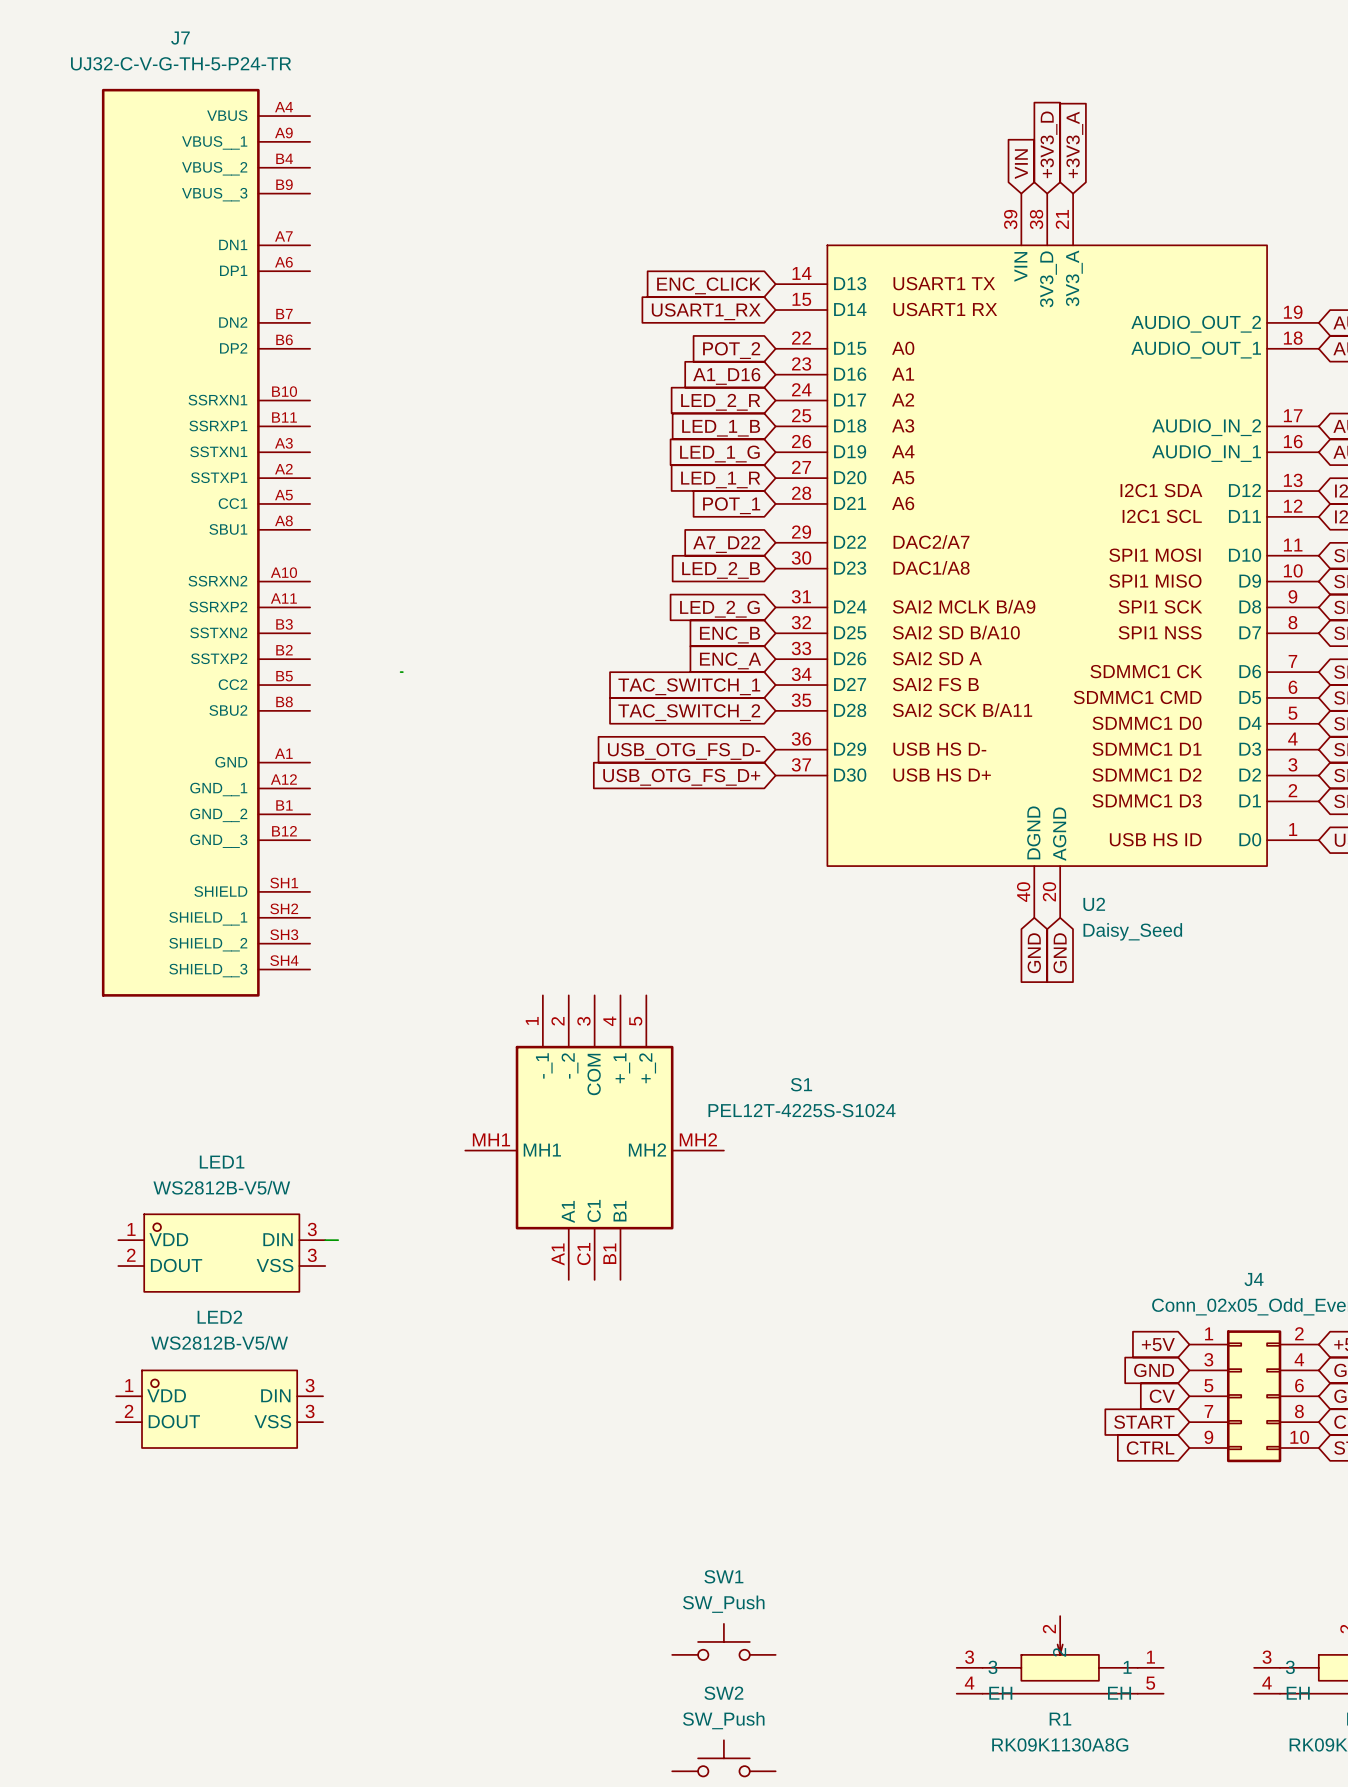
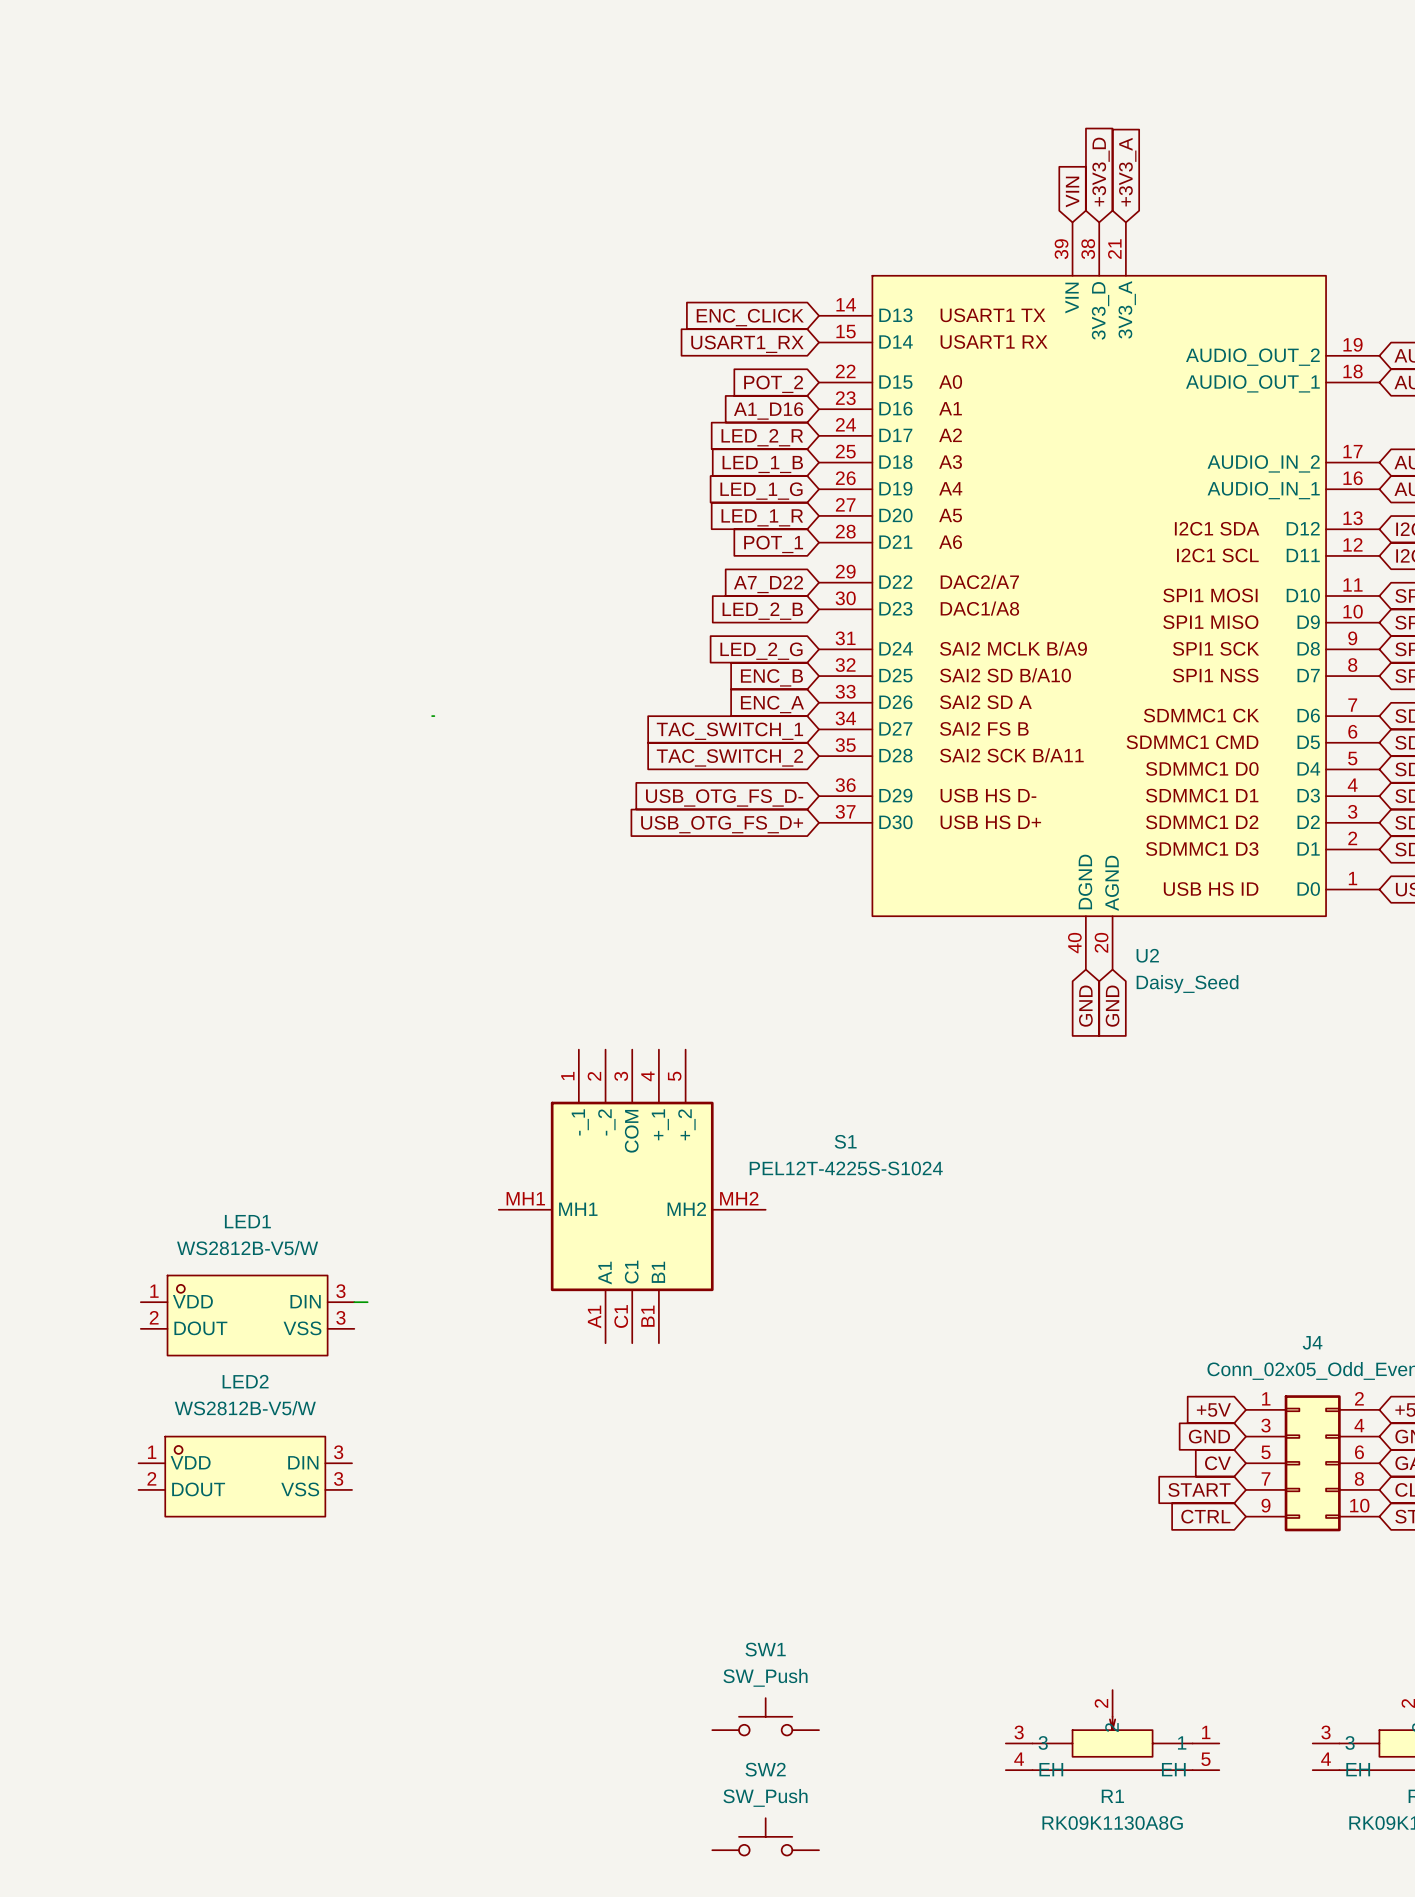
J7: UJ32-C-V-G-TH-5-P24-TR (206, 542) -> none

